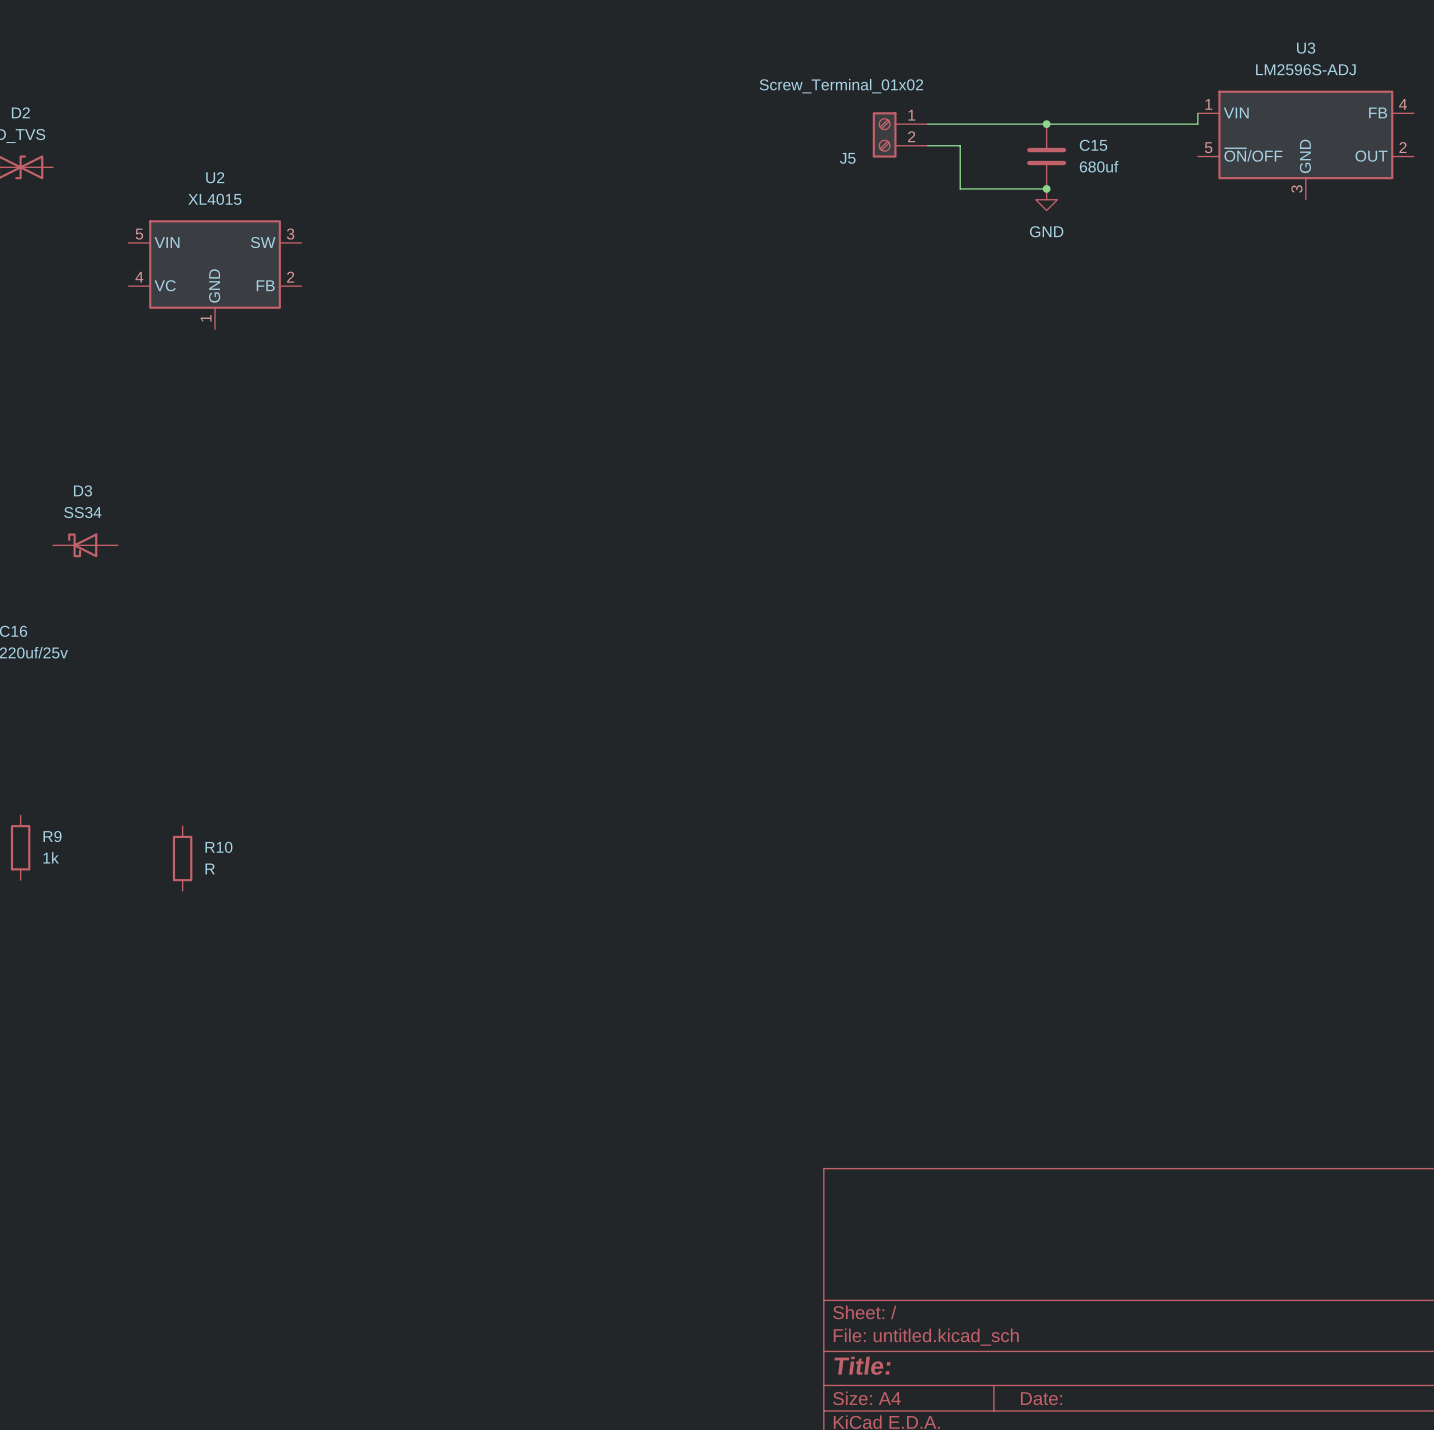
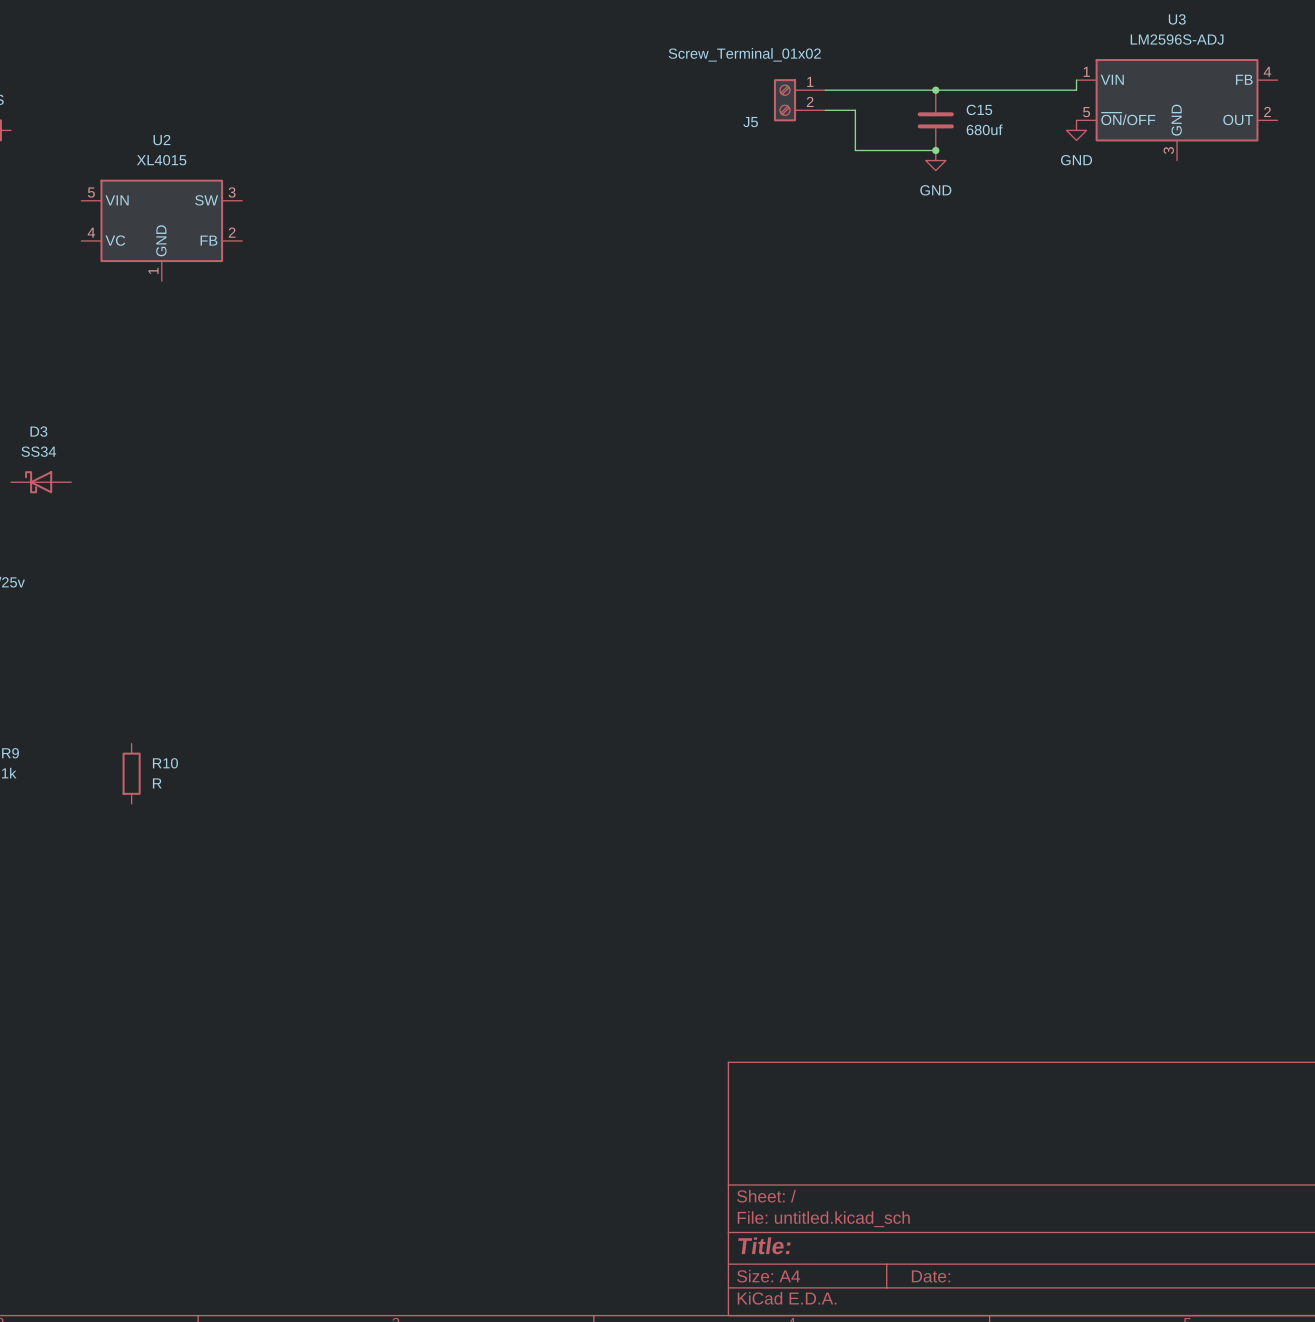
power symbol: none -> GND (1076, 130)

